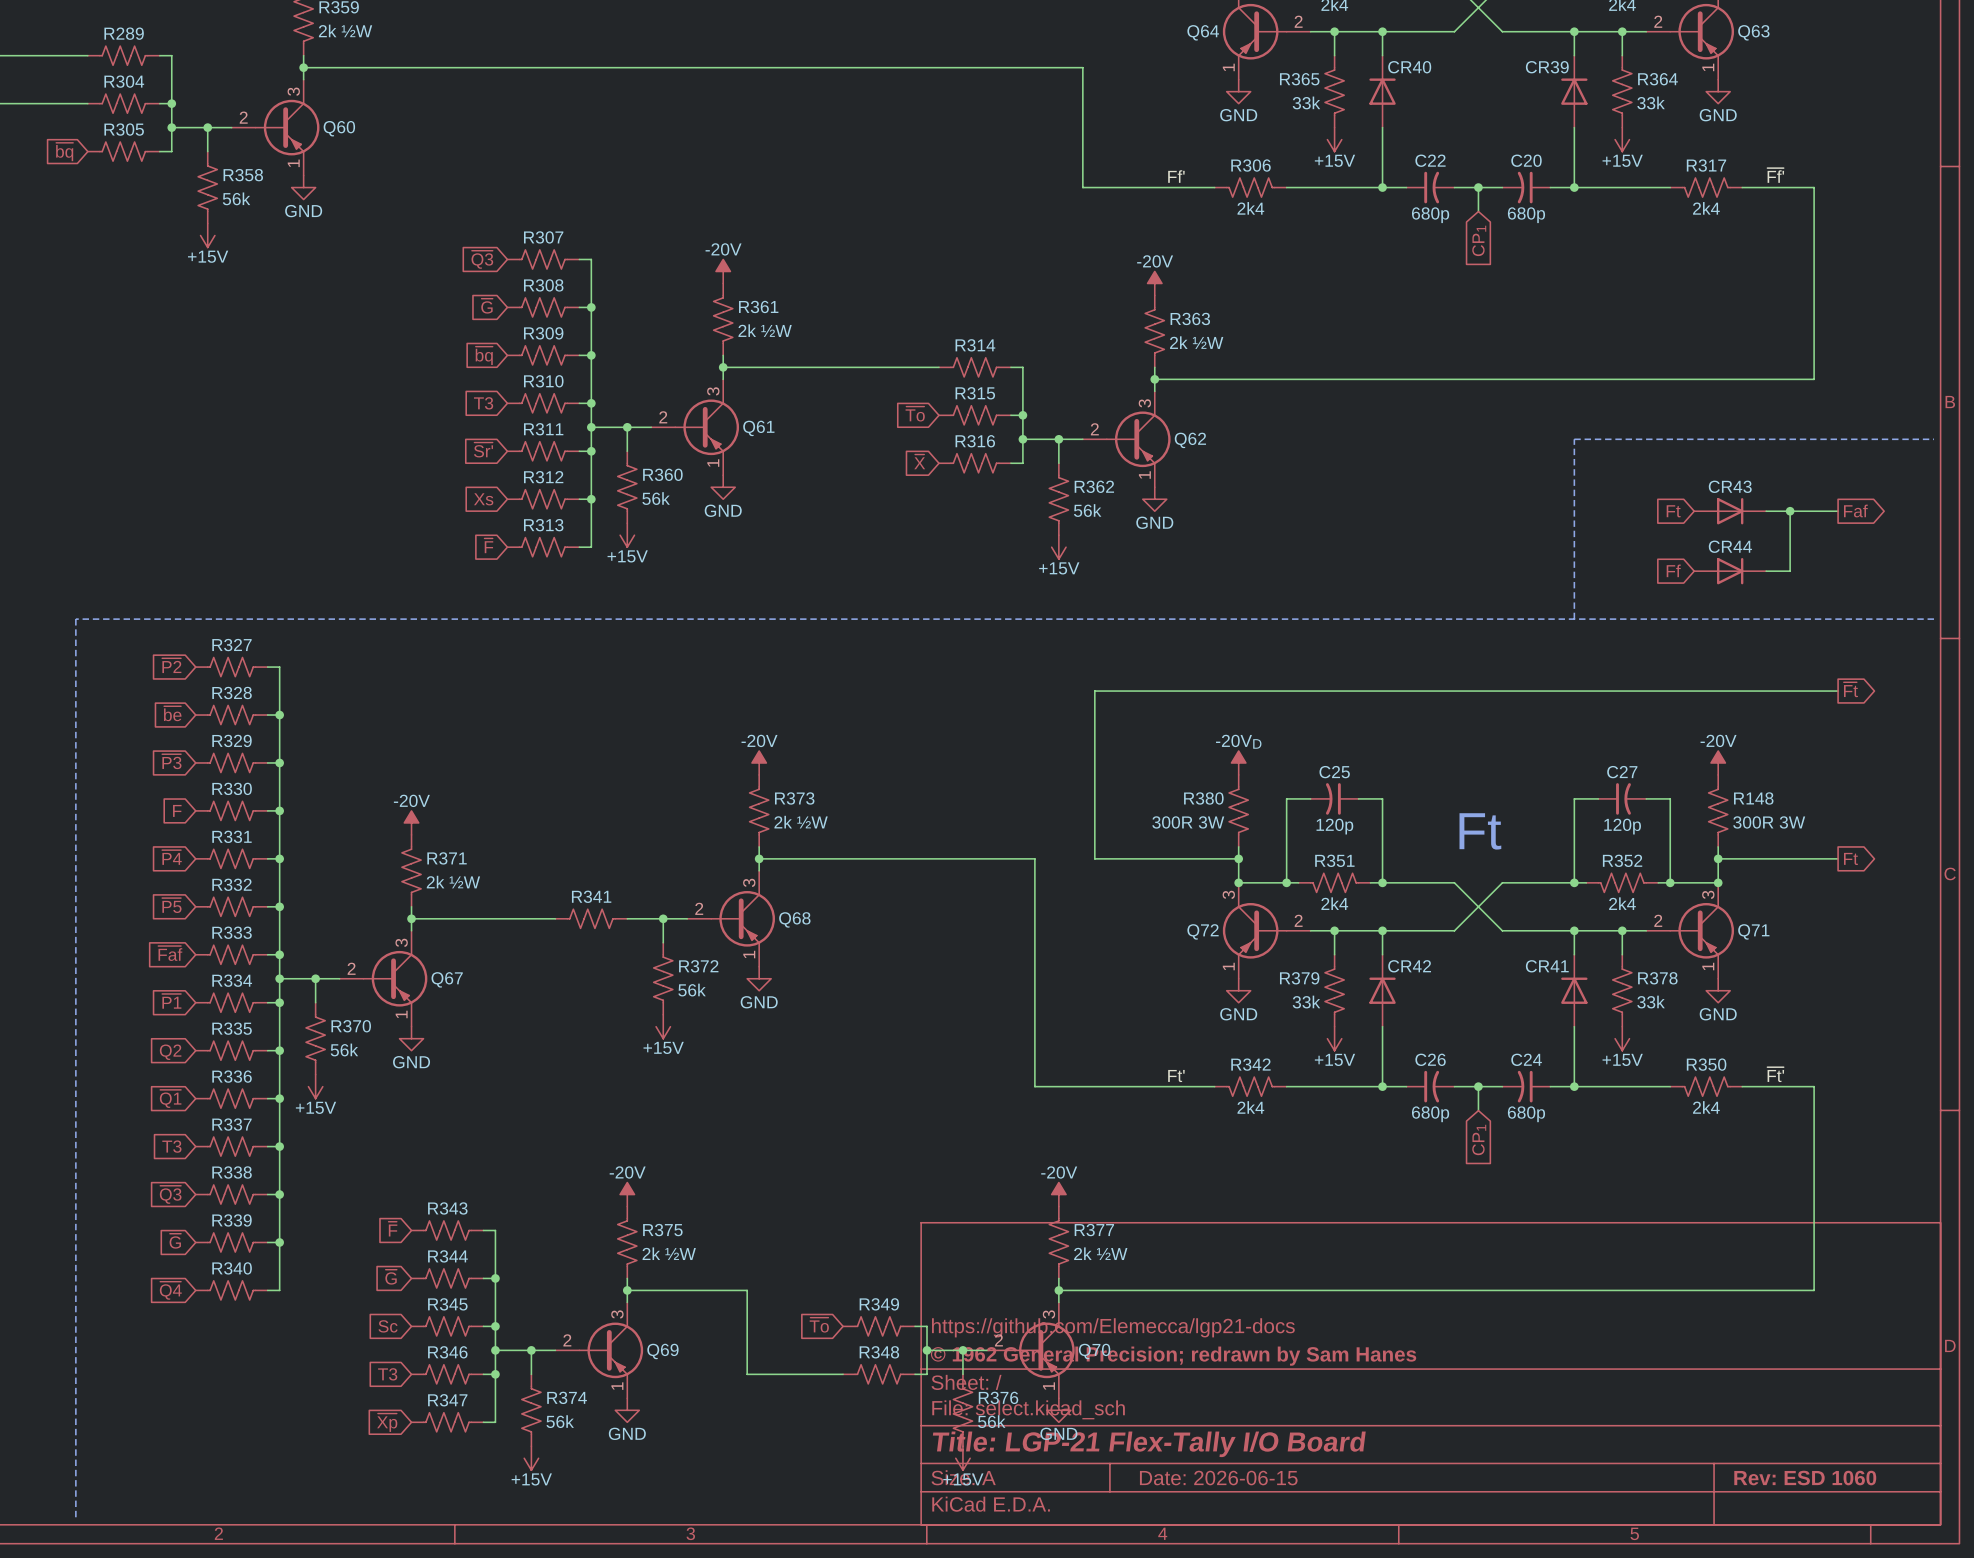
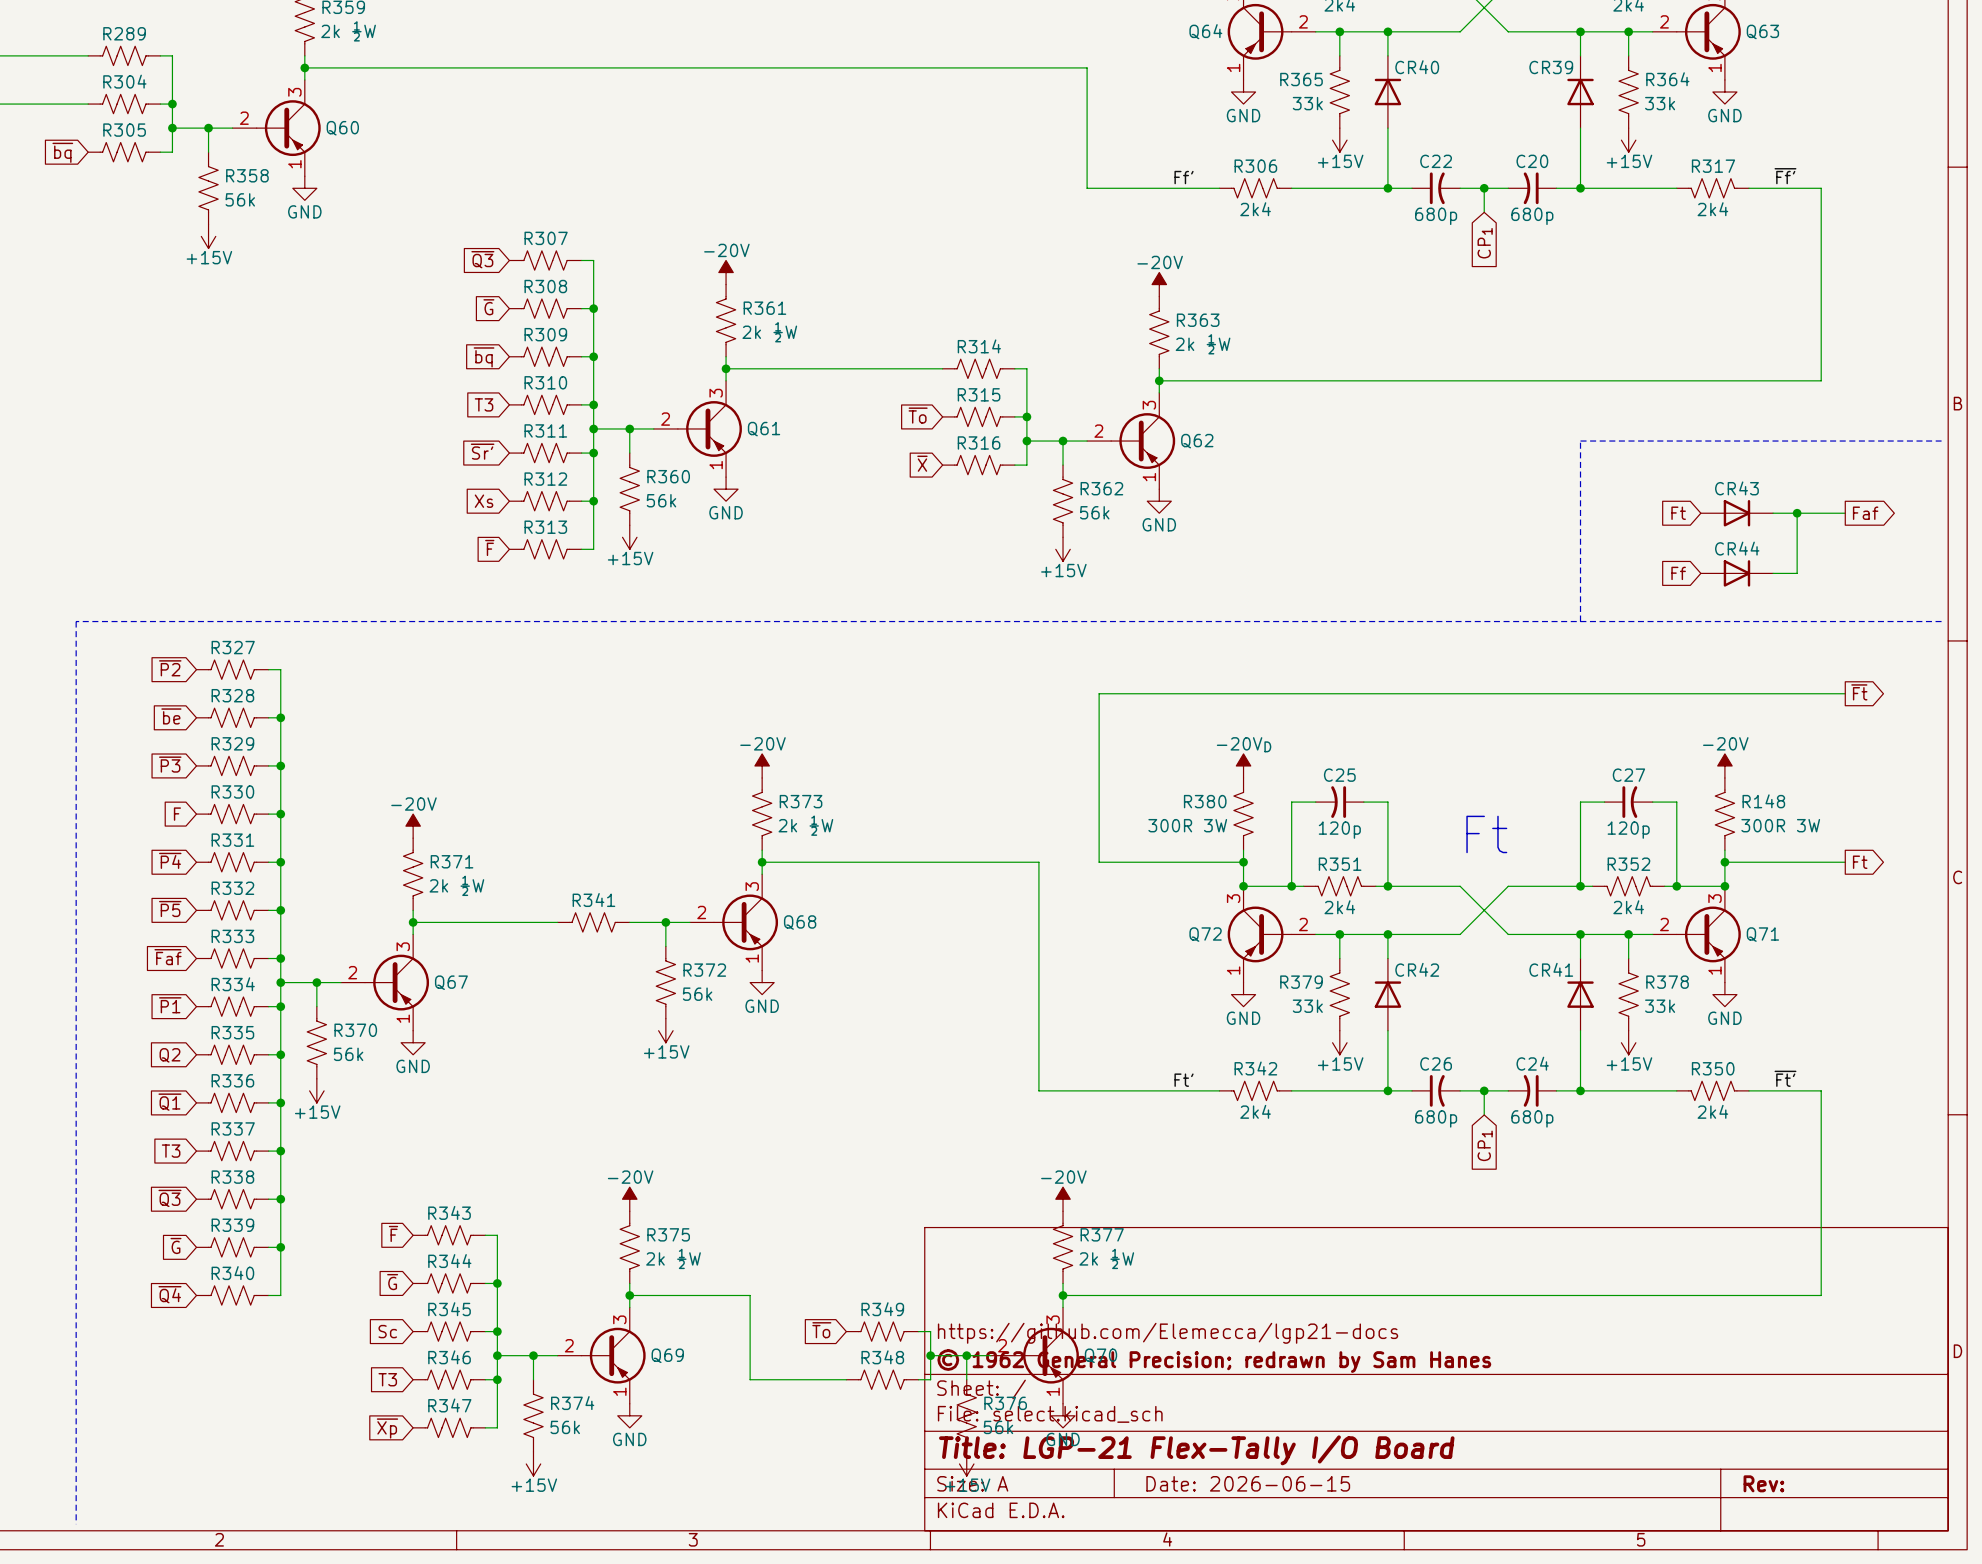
title block: Rev: ESD 1060 (1805, 1478) -> Rev: (1763, 1483)

